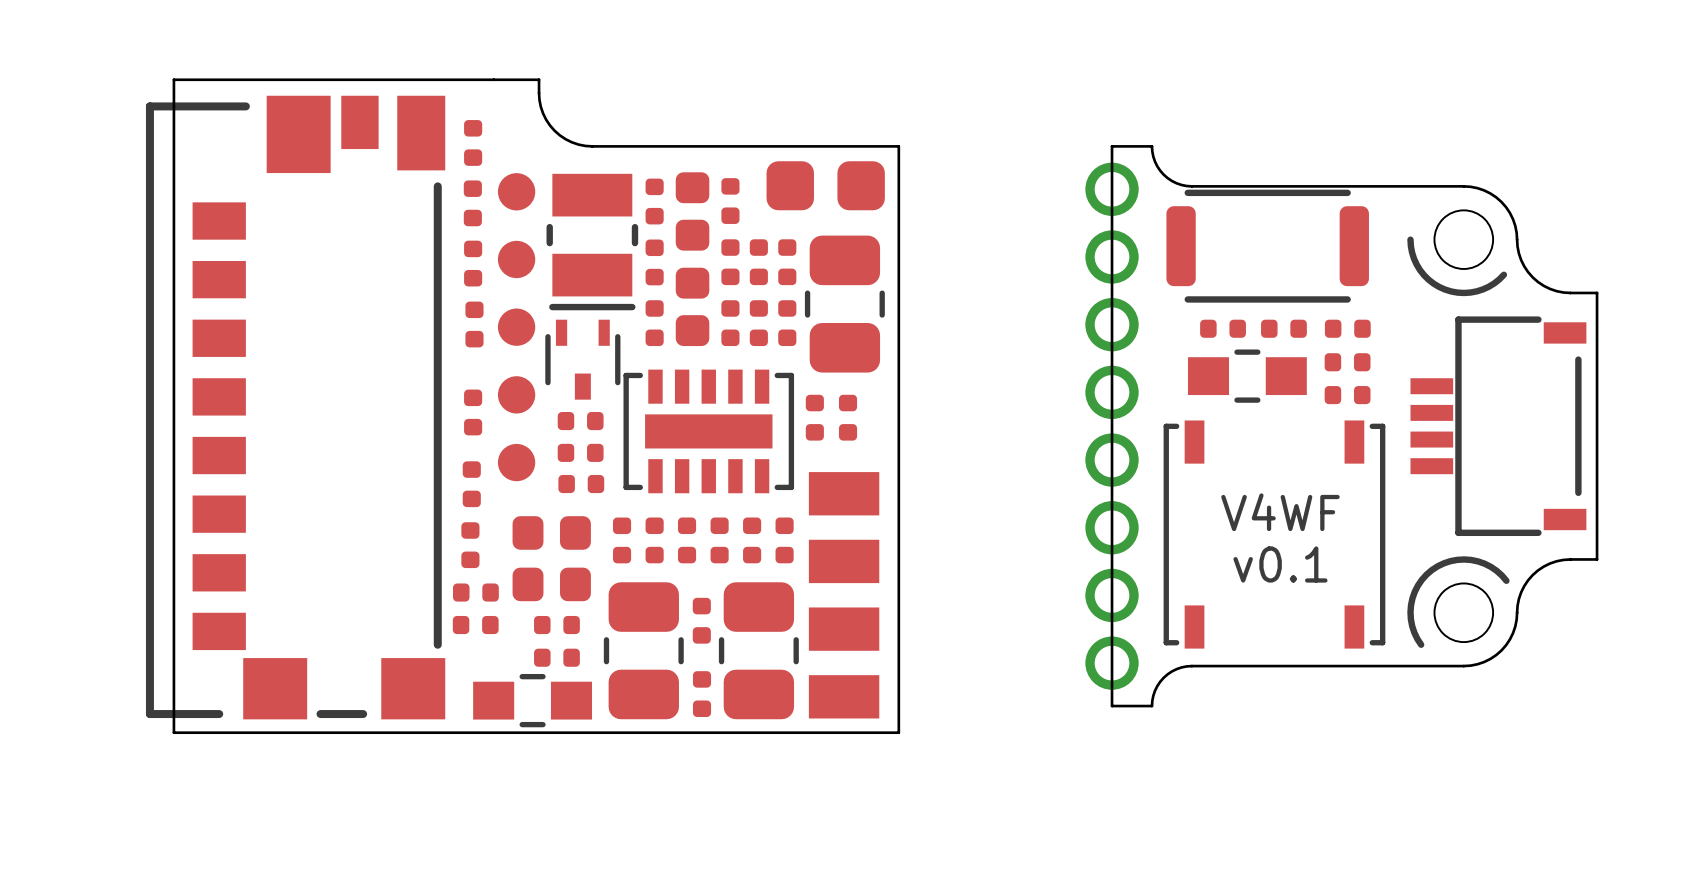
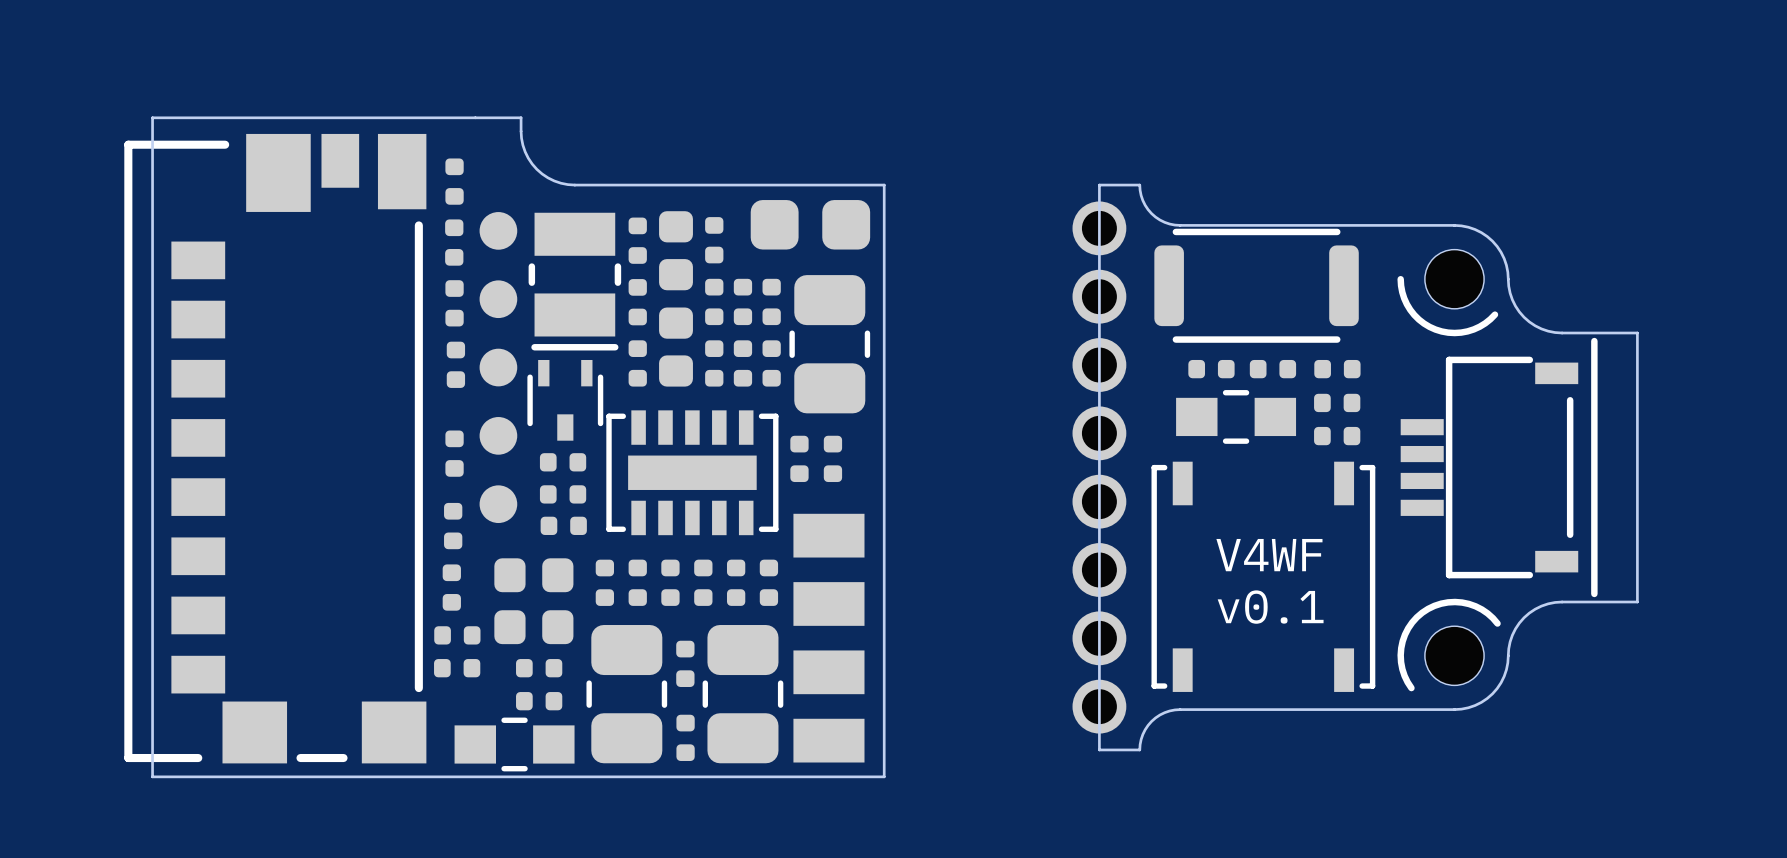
board edge: (1597, 292) (1597, 559) -> (1588, 333) (1637, 333) (1637, 602) (1588, 602)
line: none -> (1594, 341) (1594, 593)

